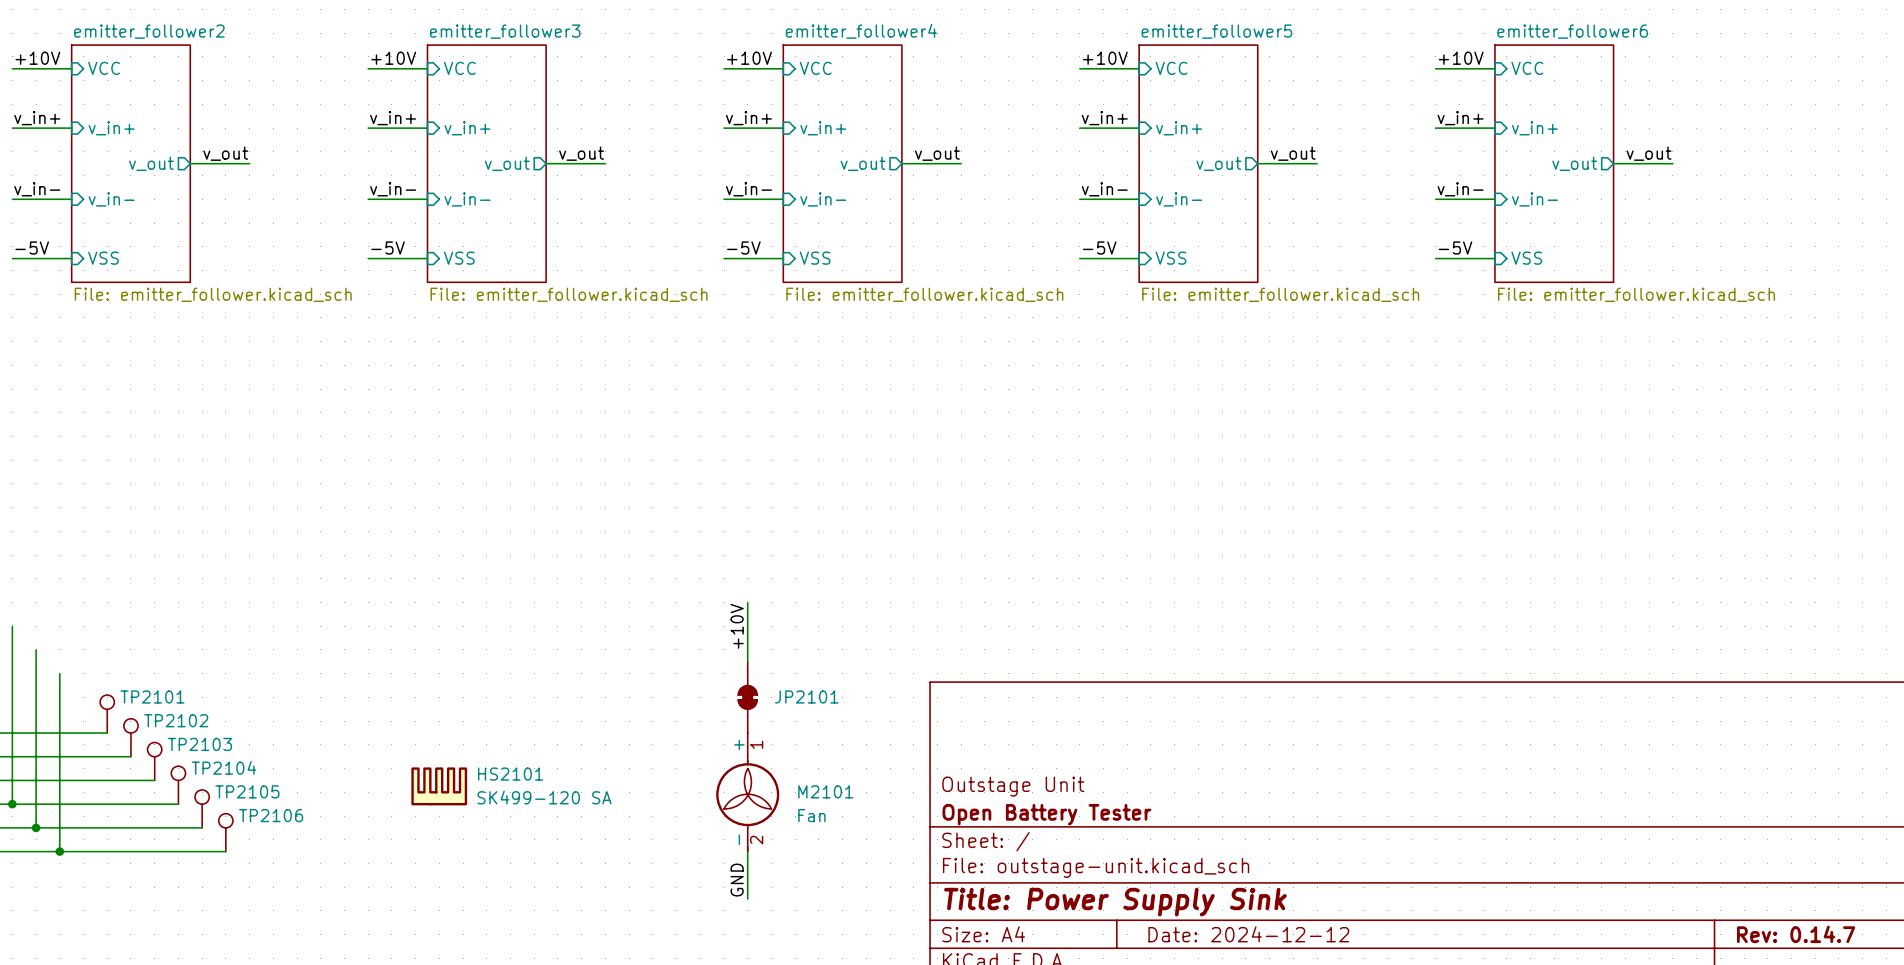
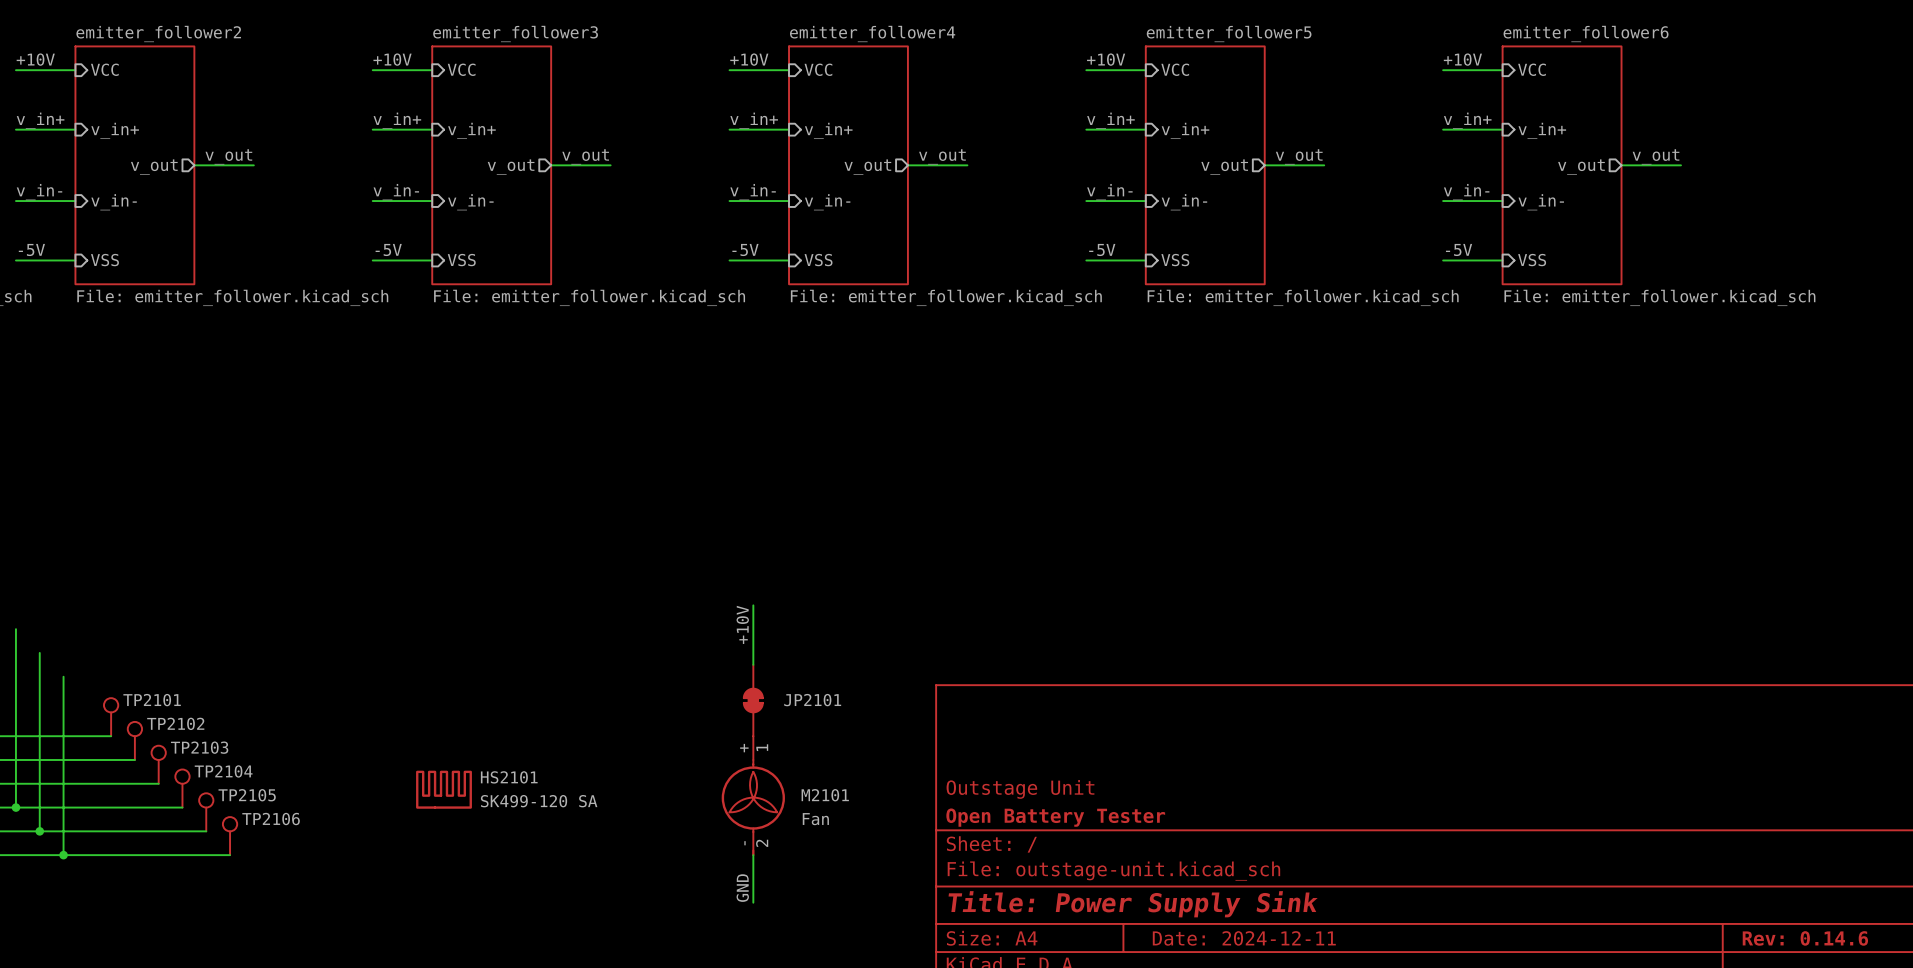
title block: Date: 2024-12-12 (1248, 934) -> Date: 2024-12-11 (1244, 938)
title block: Rev: 0.14.7 (1796, 934) -> Rev: 0.14.6 (1805, 938)

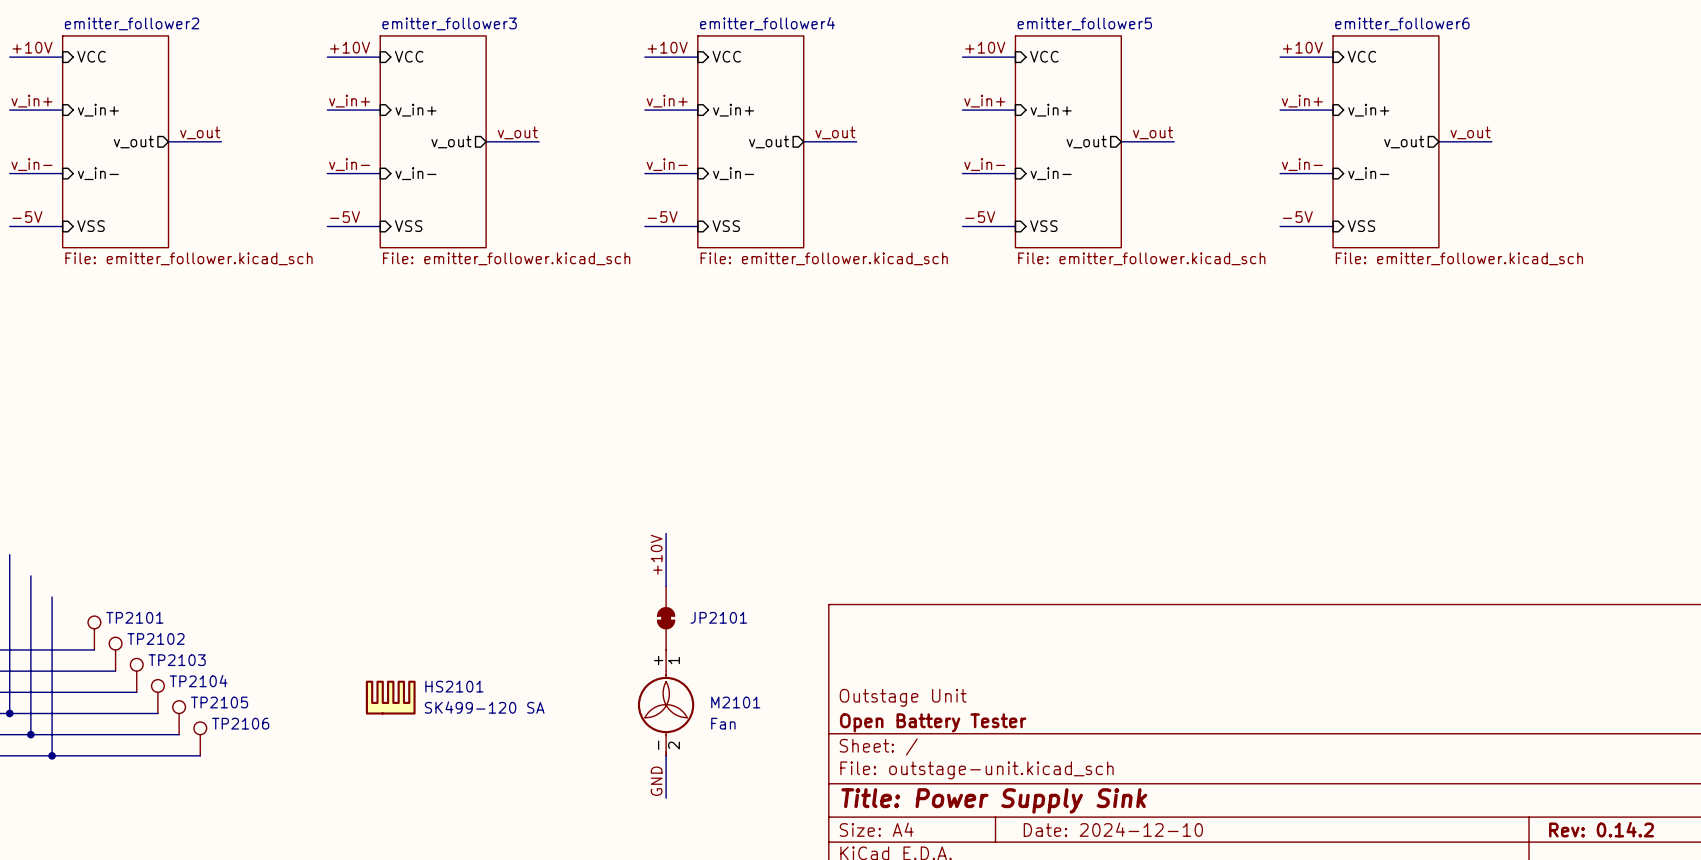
title block: Date: 2024-12-11 (1244, 938) -> Date: 2024-12-10 (1113, 829)
title block: Rev: 0.14.6 (1805, 938) -> Rev: 0.14.2 (1601, 829)

